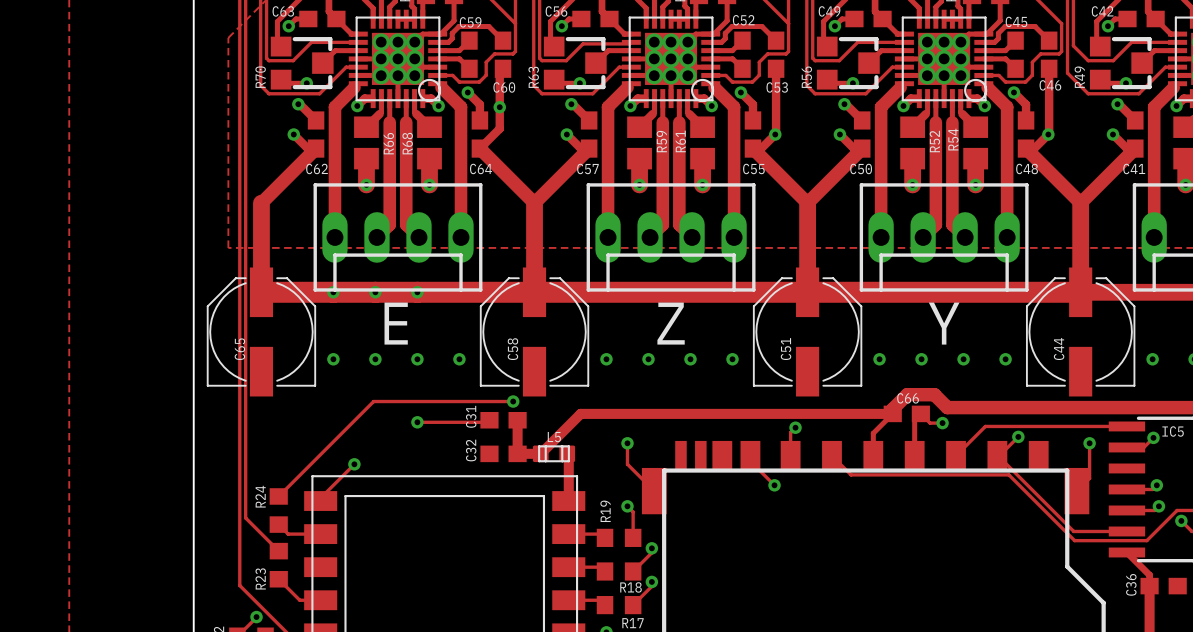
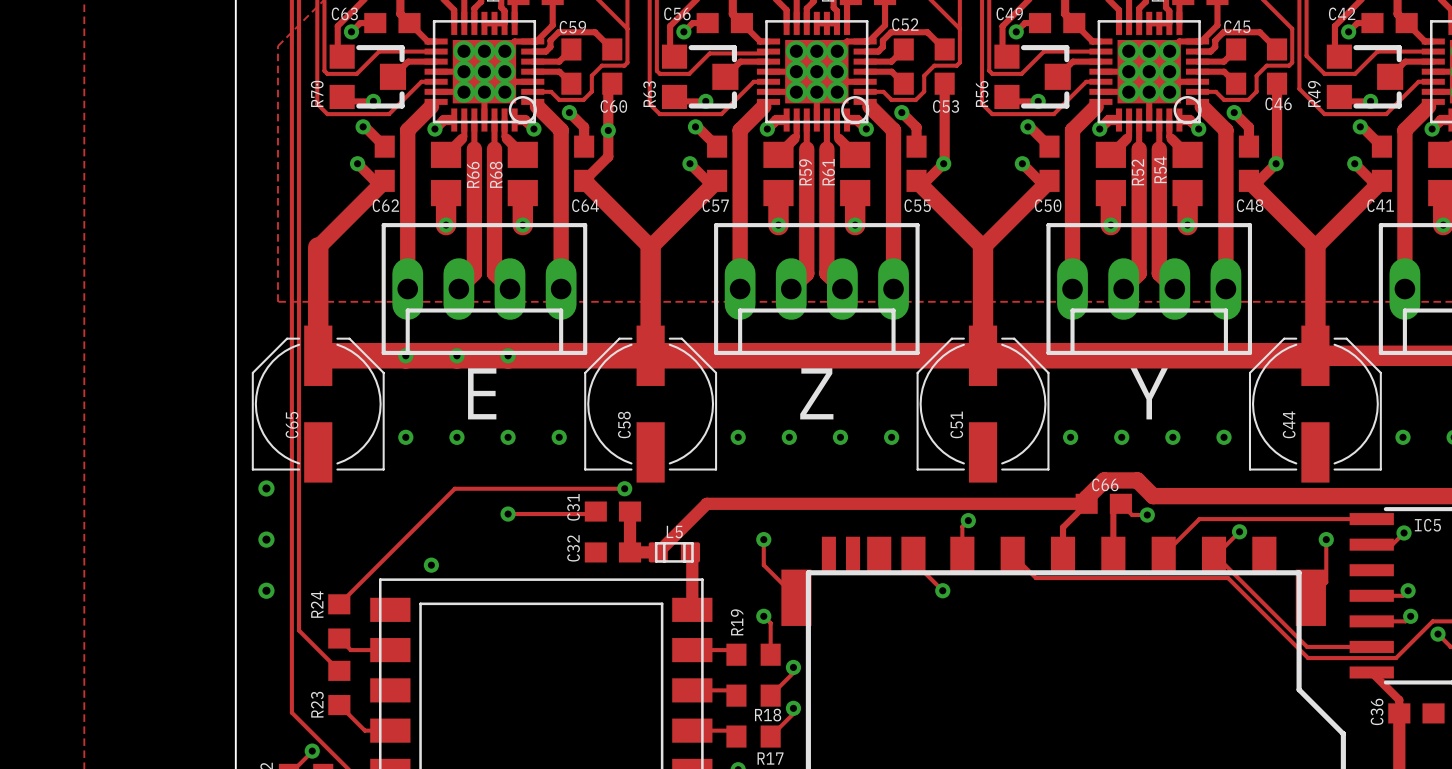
via: none -> (266, 488)
via: none -> (266, 539)
track: (354, 464) (320, 498) -> none
via: none -> (266, 590)

